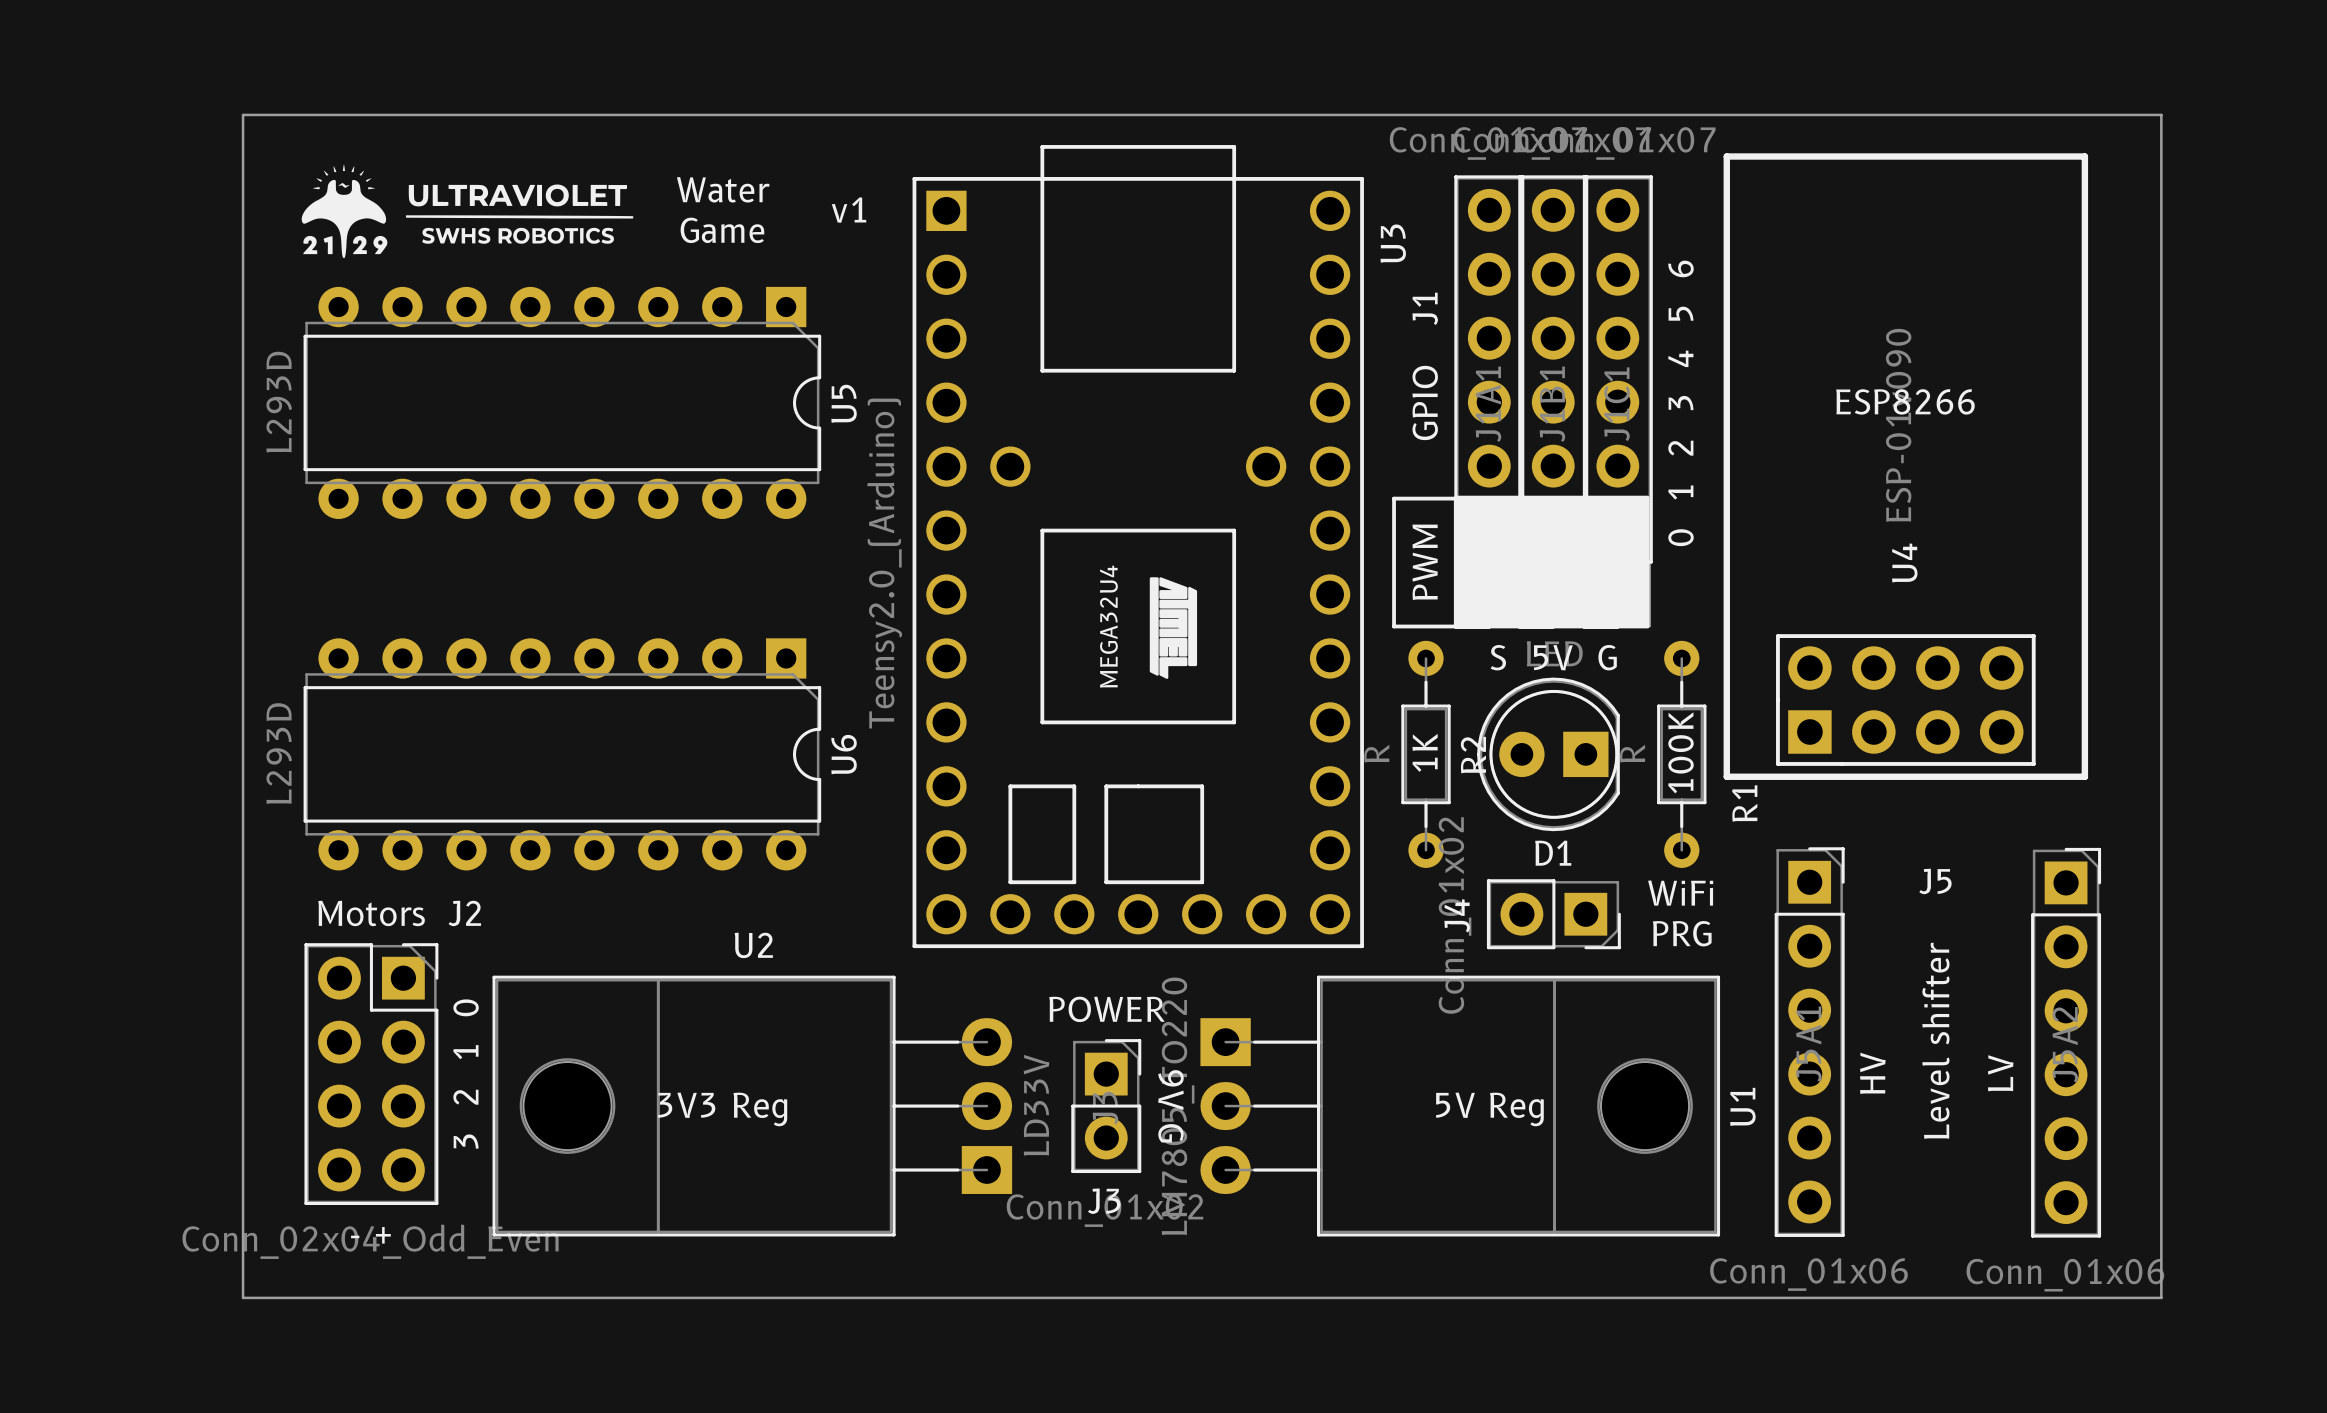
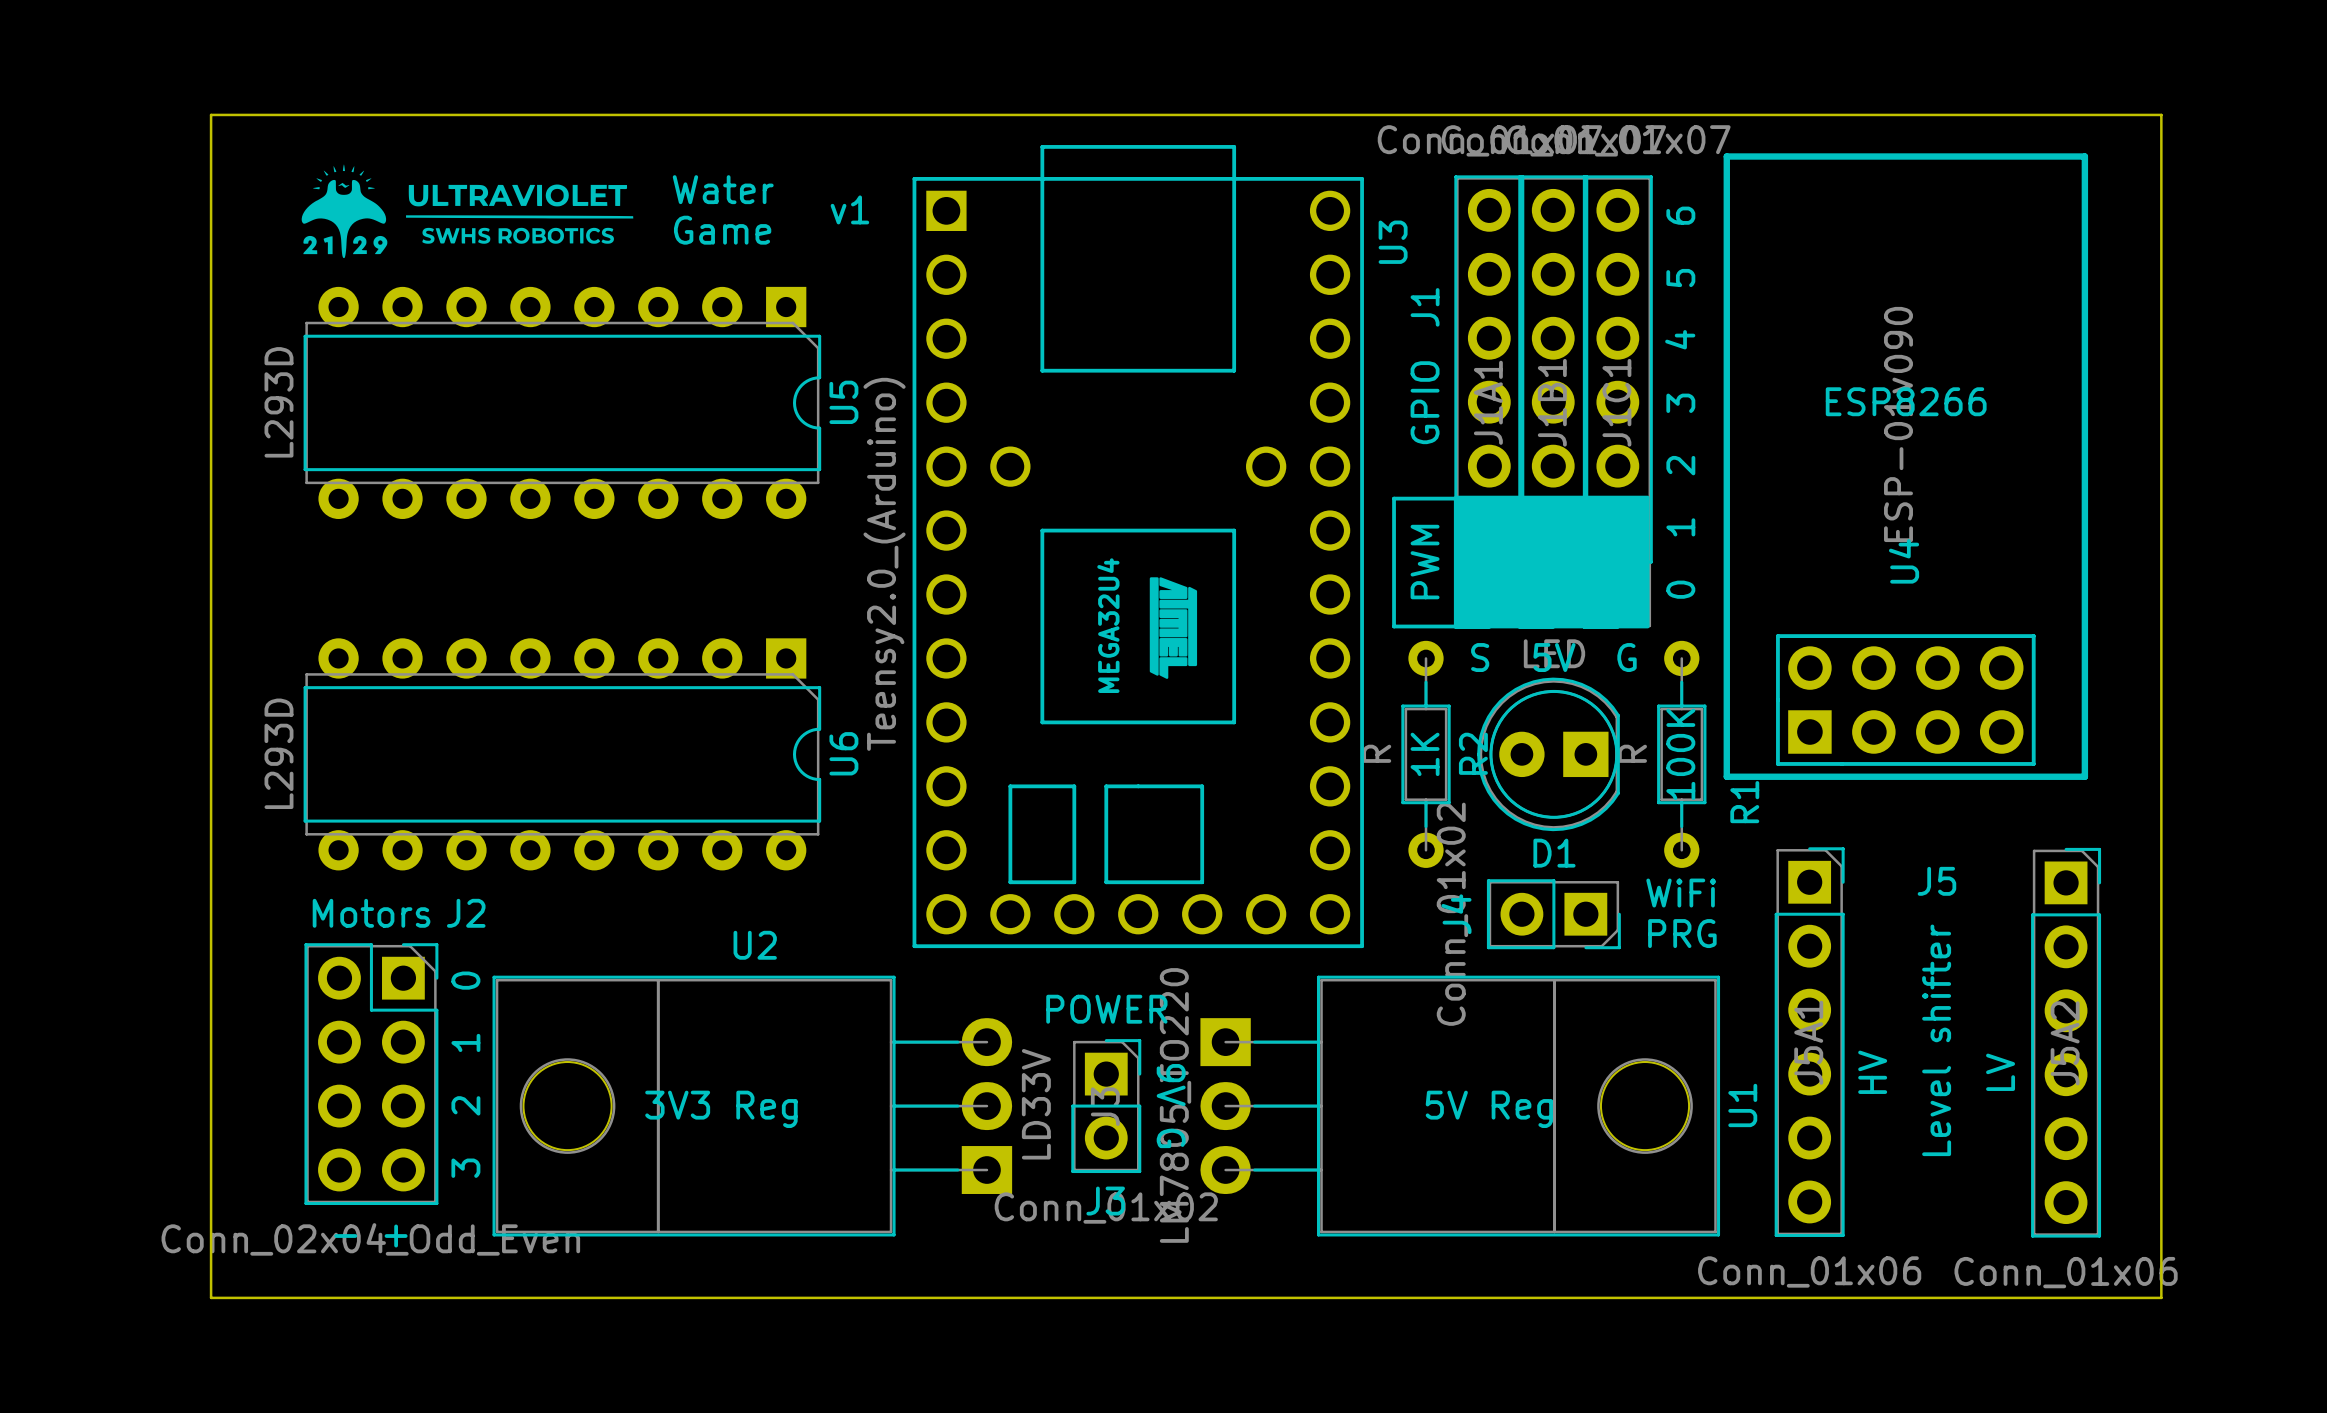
board edge: (243, 114) (243, 1297) -> (243, 114) (211, 114) (211, 1297) (243, 1297)

